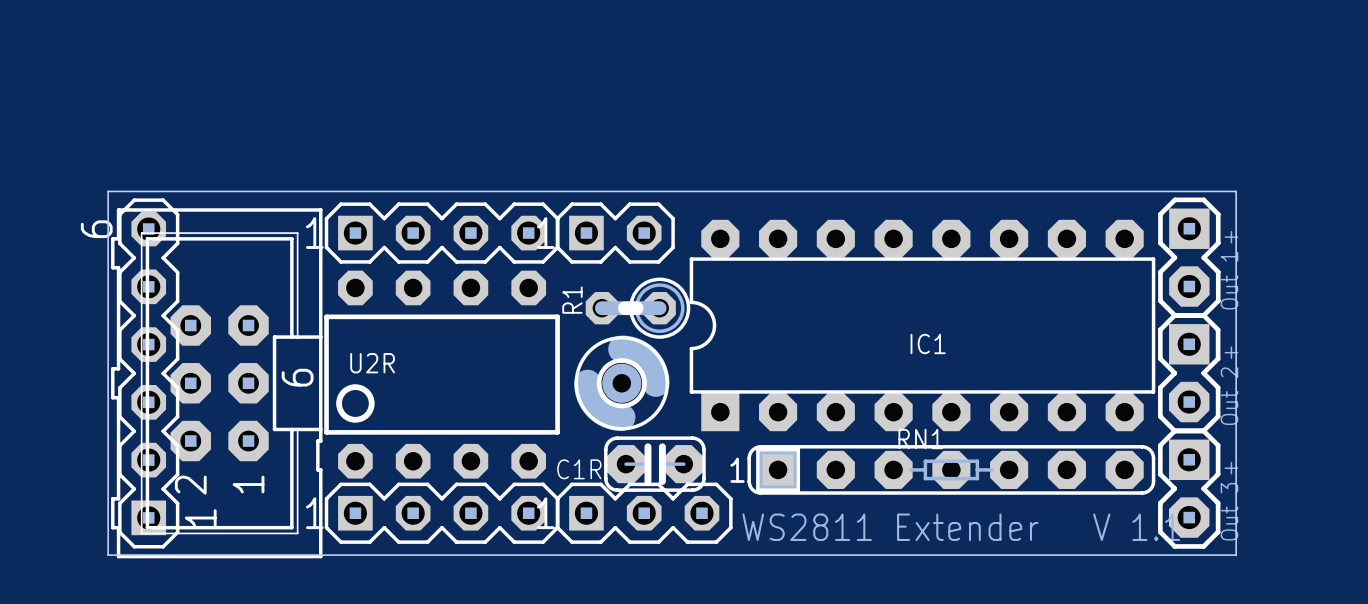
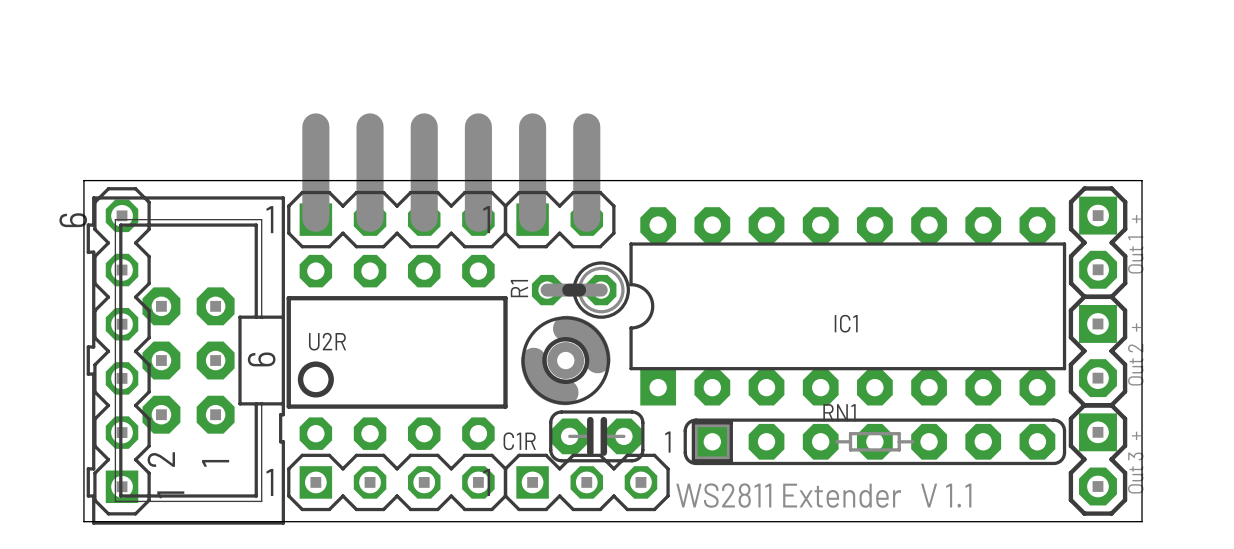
line: none -> (315, 126) (315, 218)
line: none -> (370, 126) (370, 218)
line: none -> (424, 126) (424, 218)
line: none -> (478, 126) (478, 218)
line: none -> (532, 126) (532, 218)
line: none -> (586, 126) (586, 218)

